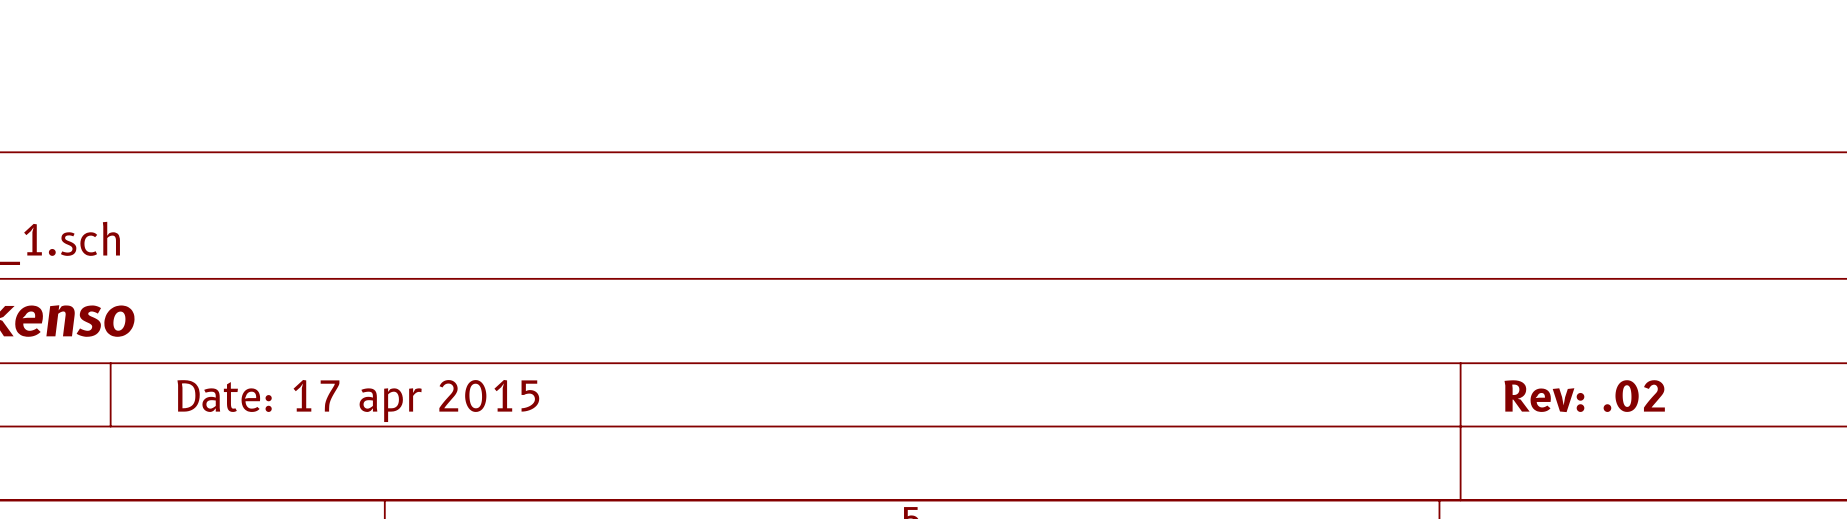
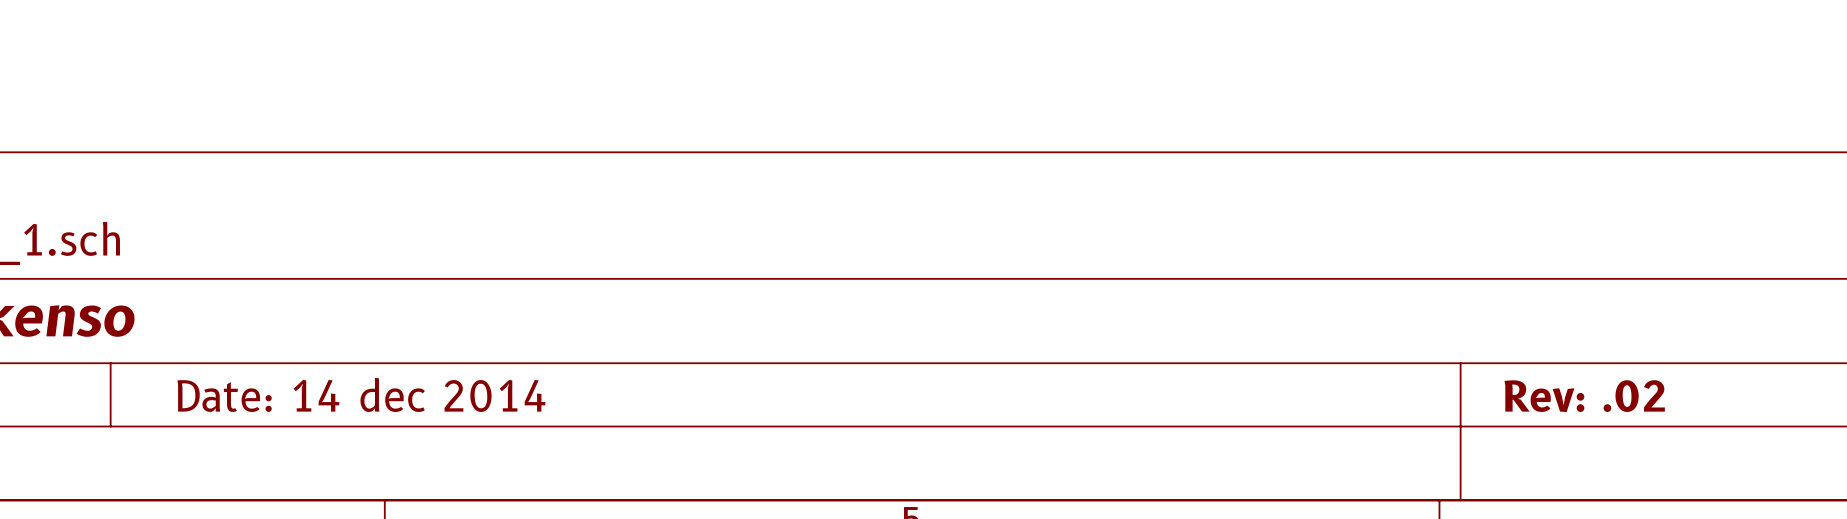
title block: Date: 17 apr 2015 (358, 401) -> Date: 14 dec 2014 (361, 394)

